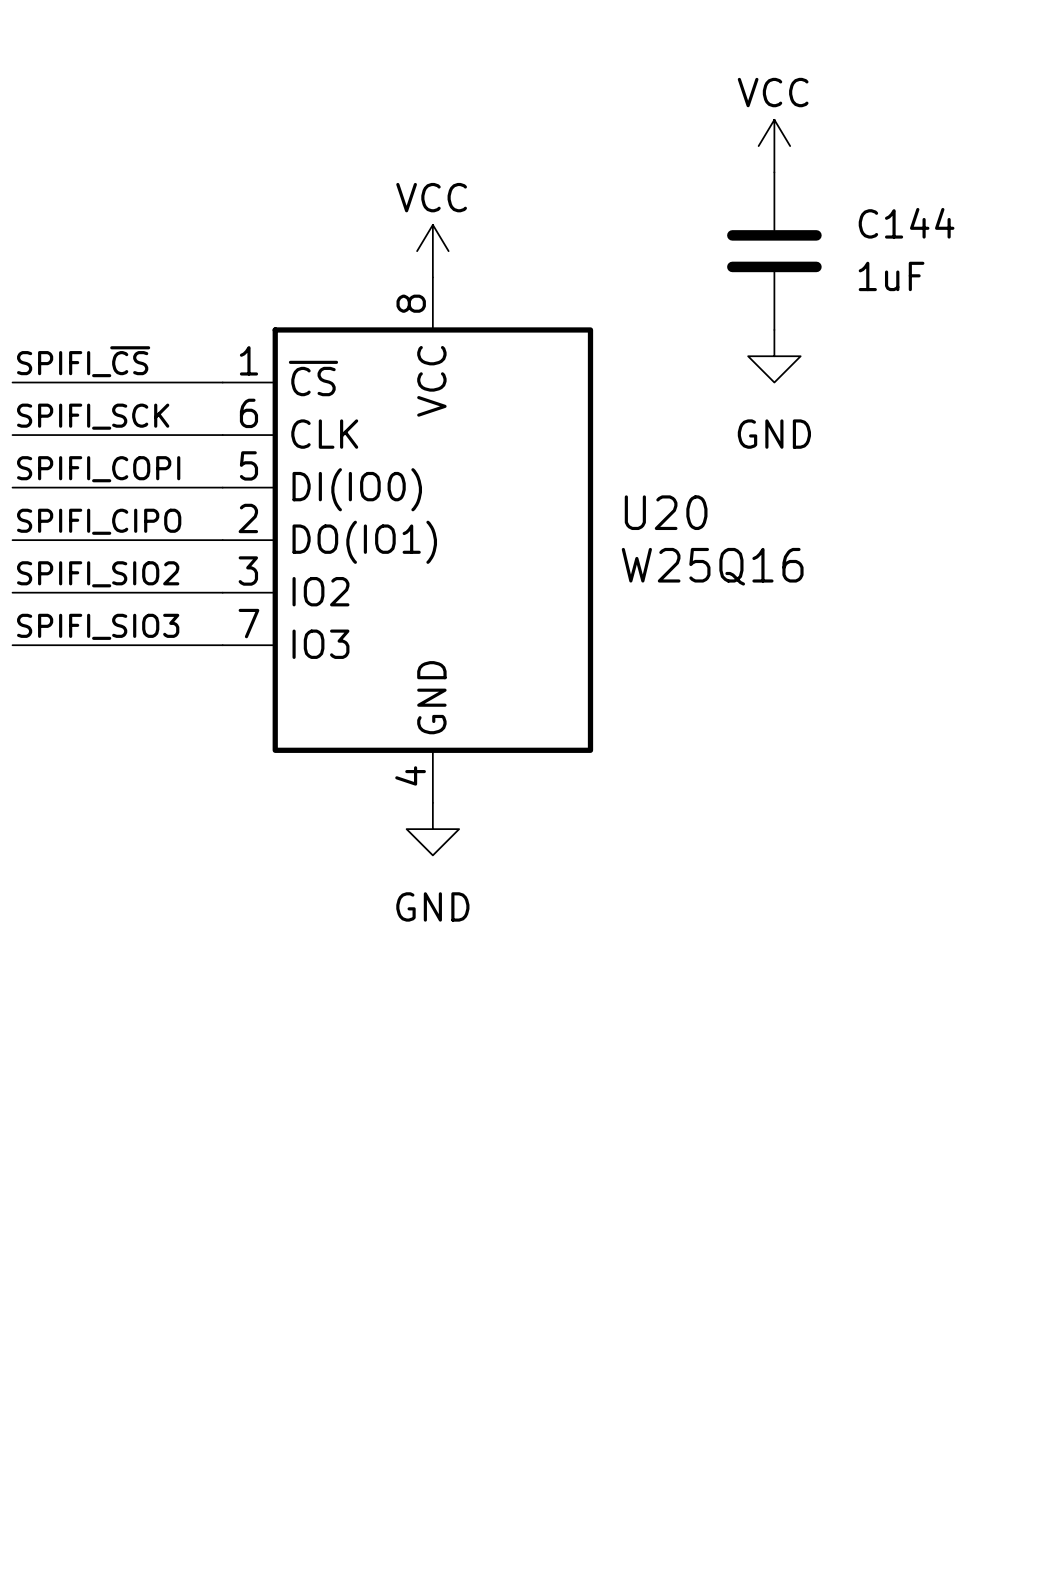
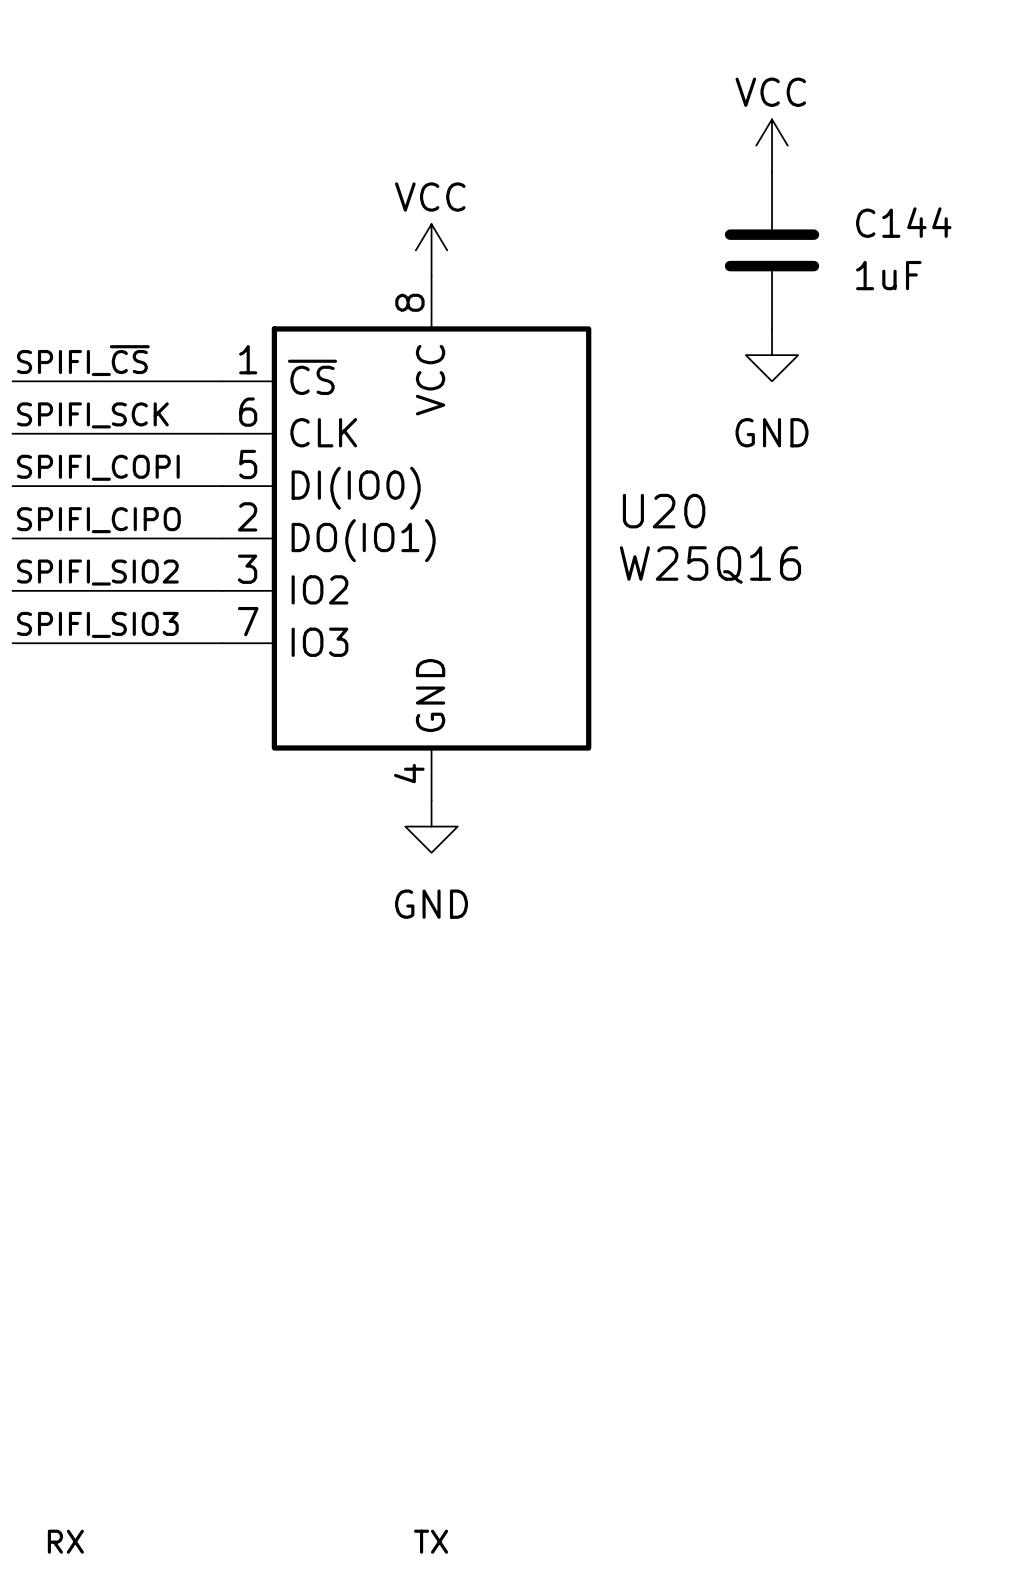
text: none -> RX (65, 1541)
text: none -> TX (431, 1541)

